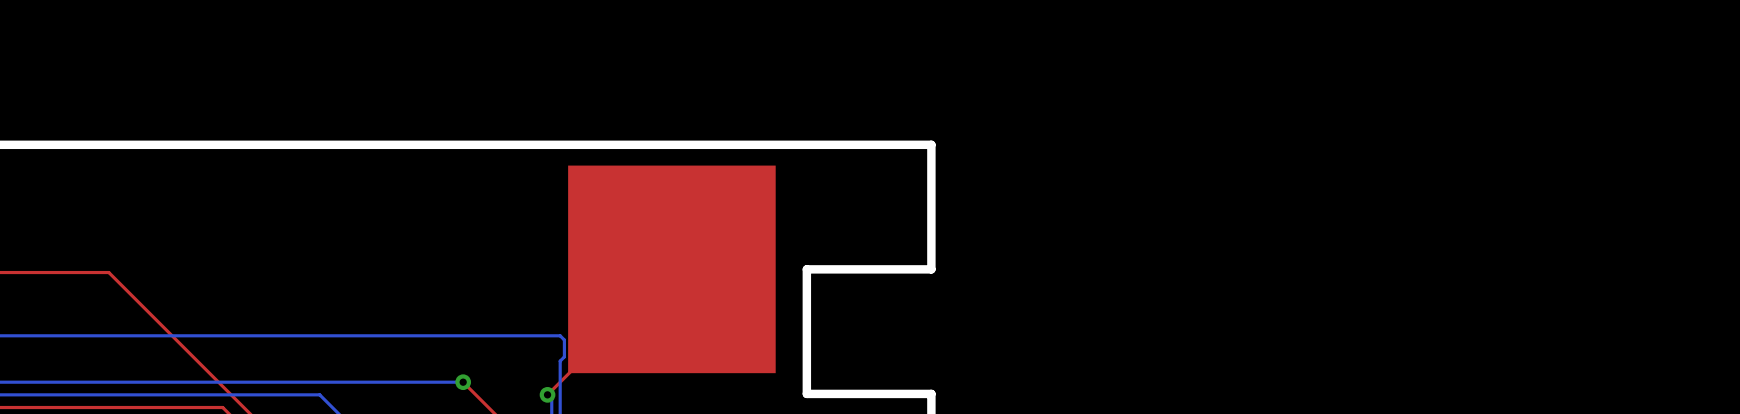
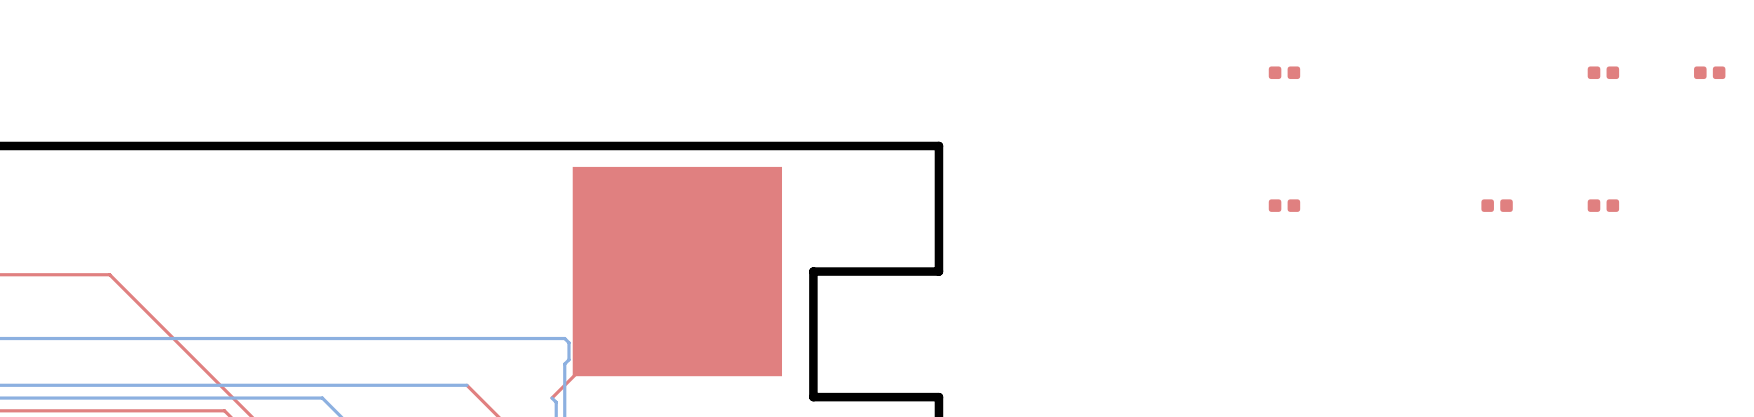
part: none -> (1284, 72)
part: none -> (1603, 72)
part: none -> (1709, 72)
part: none -> (1284, 205)
part: none -> (1497, 205)
part: none -> (1603, 205)
via: (463, 382) -> none
via: (547, 394) -> none

